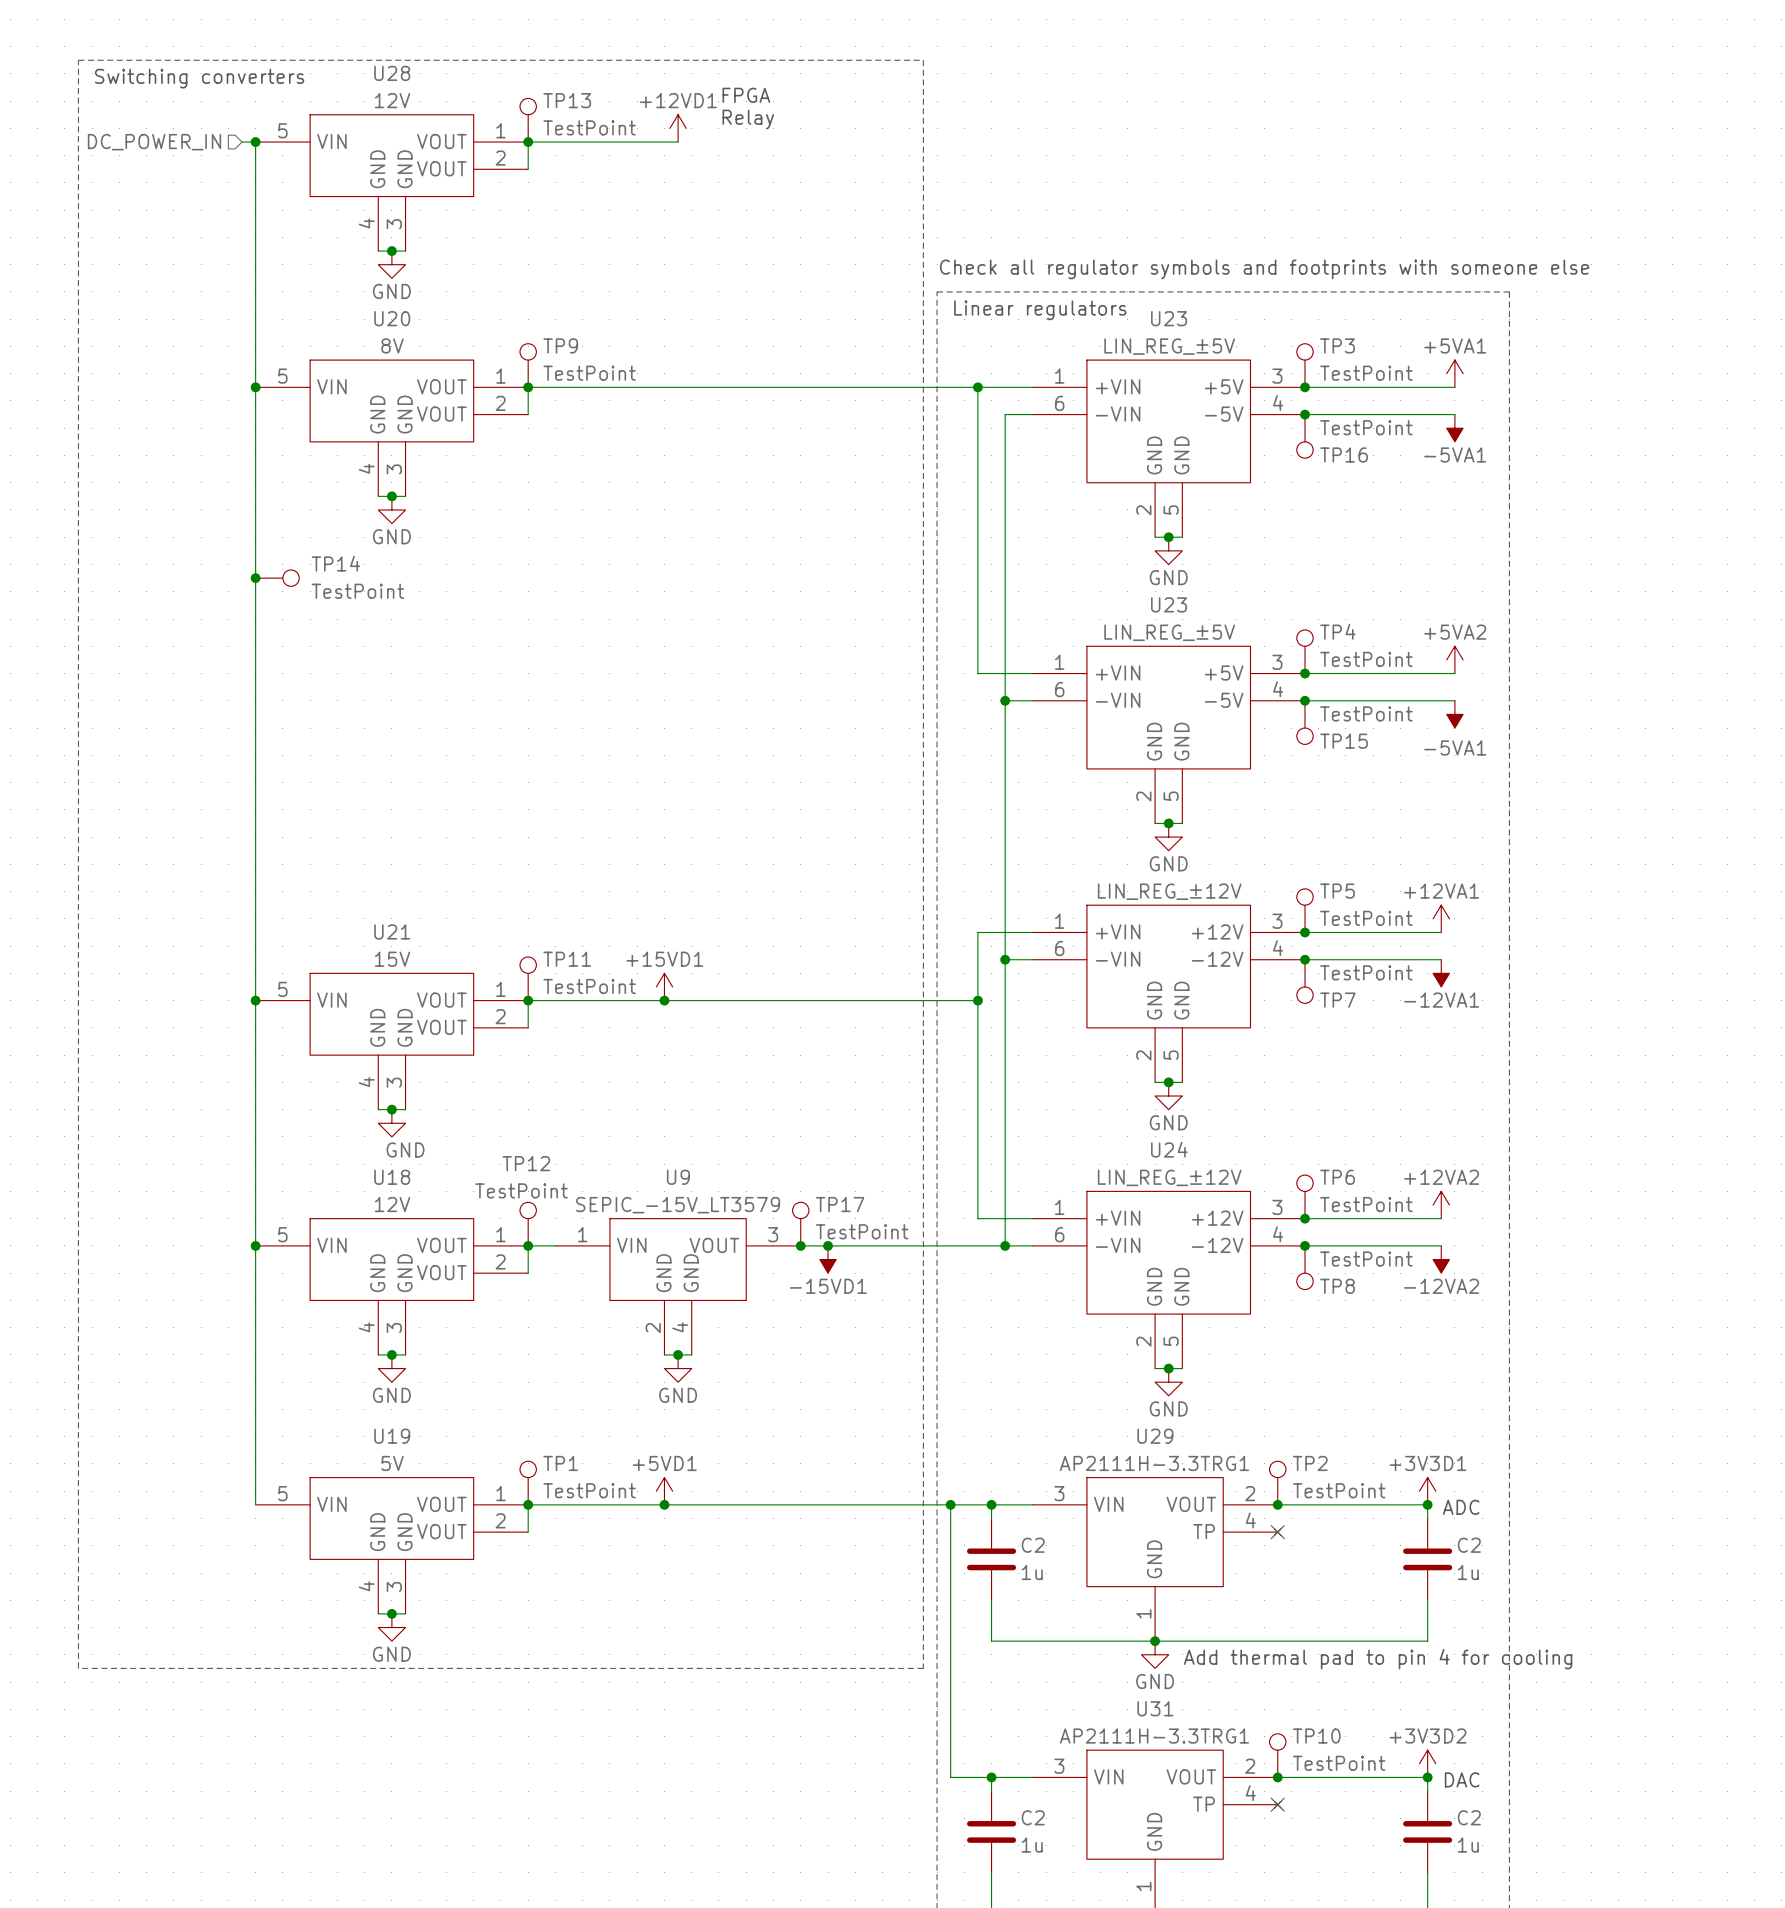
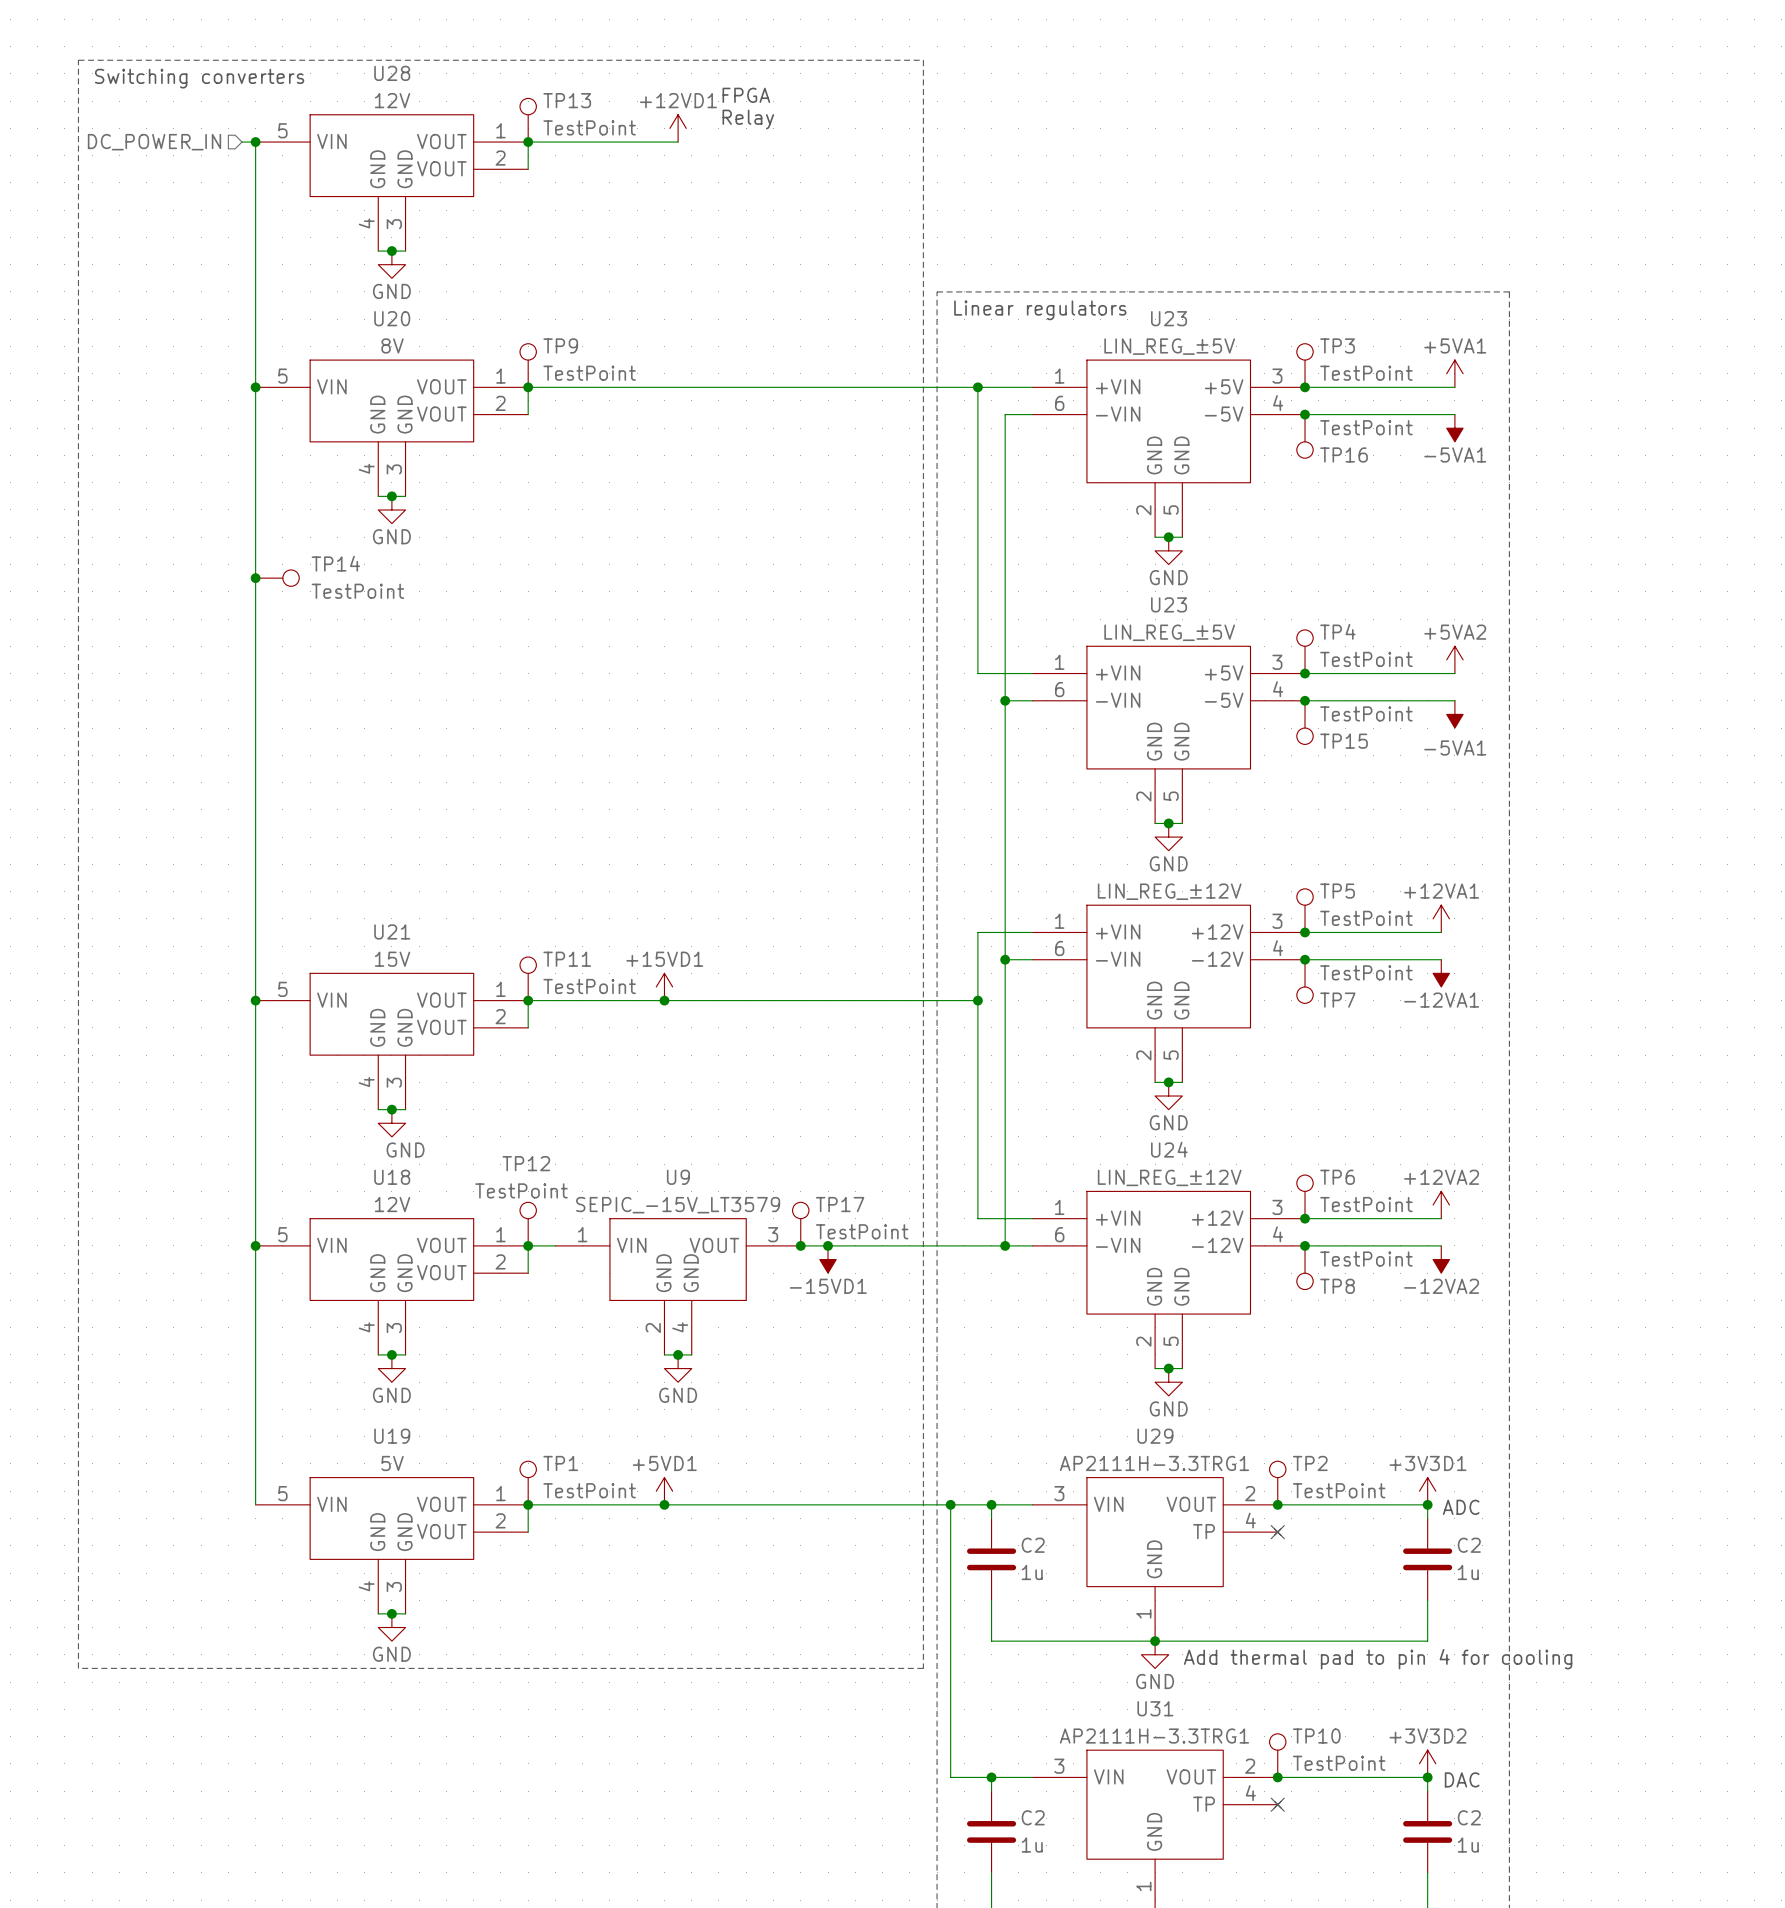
text: Check all regulator symbols and footprints with someone else (1264, 269) -> none

